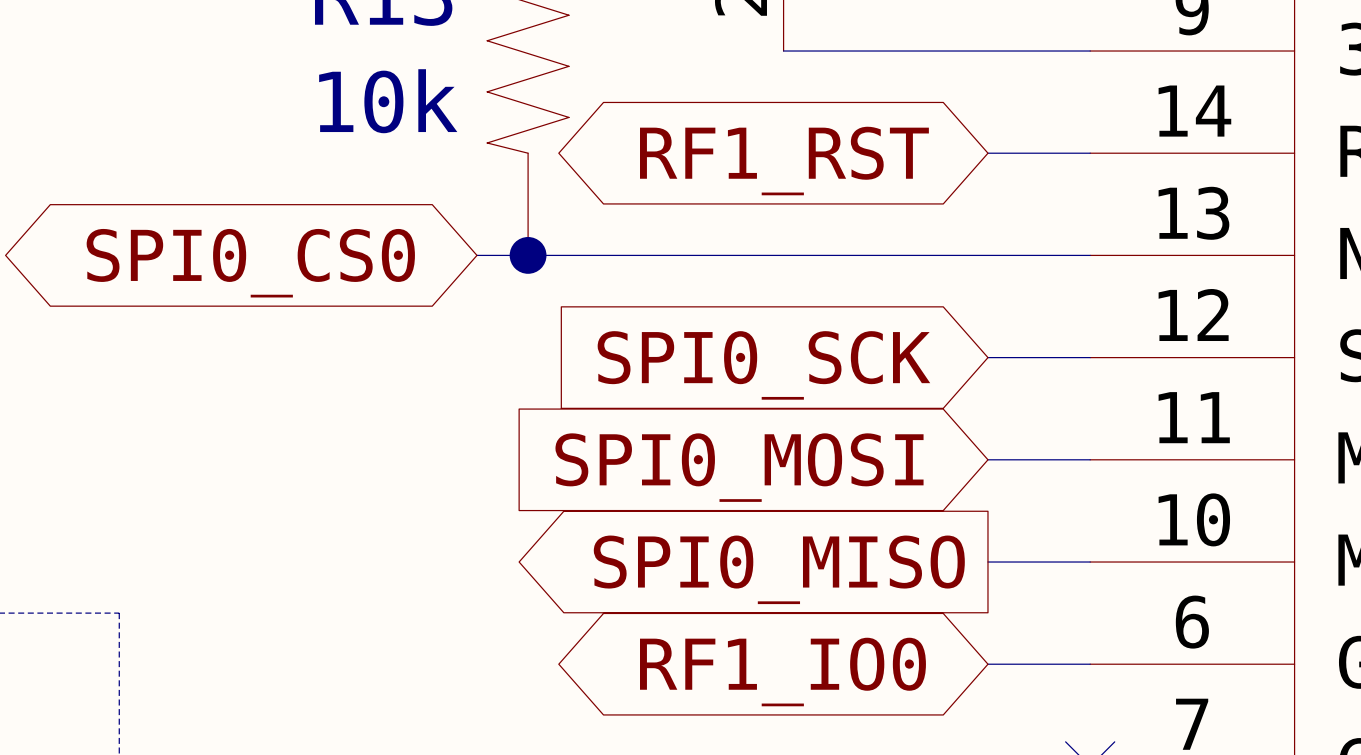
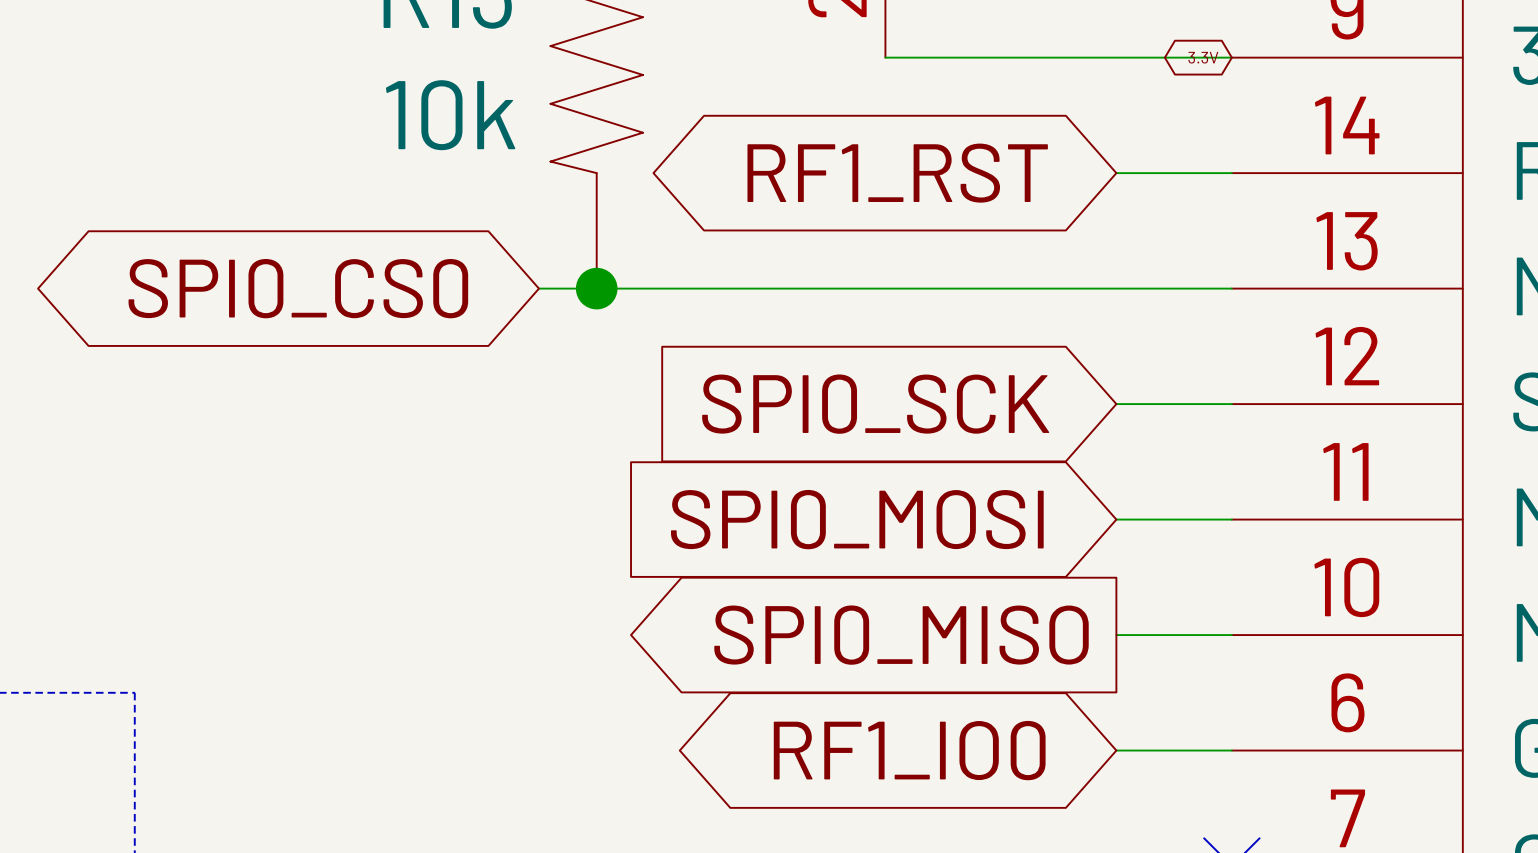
global label: none -> 3.3V (1203, 57)

